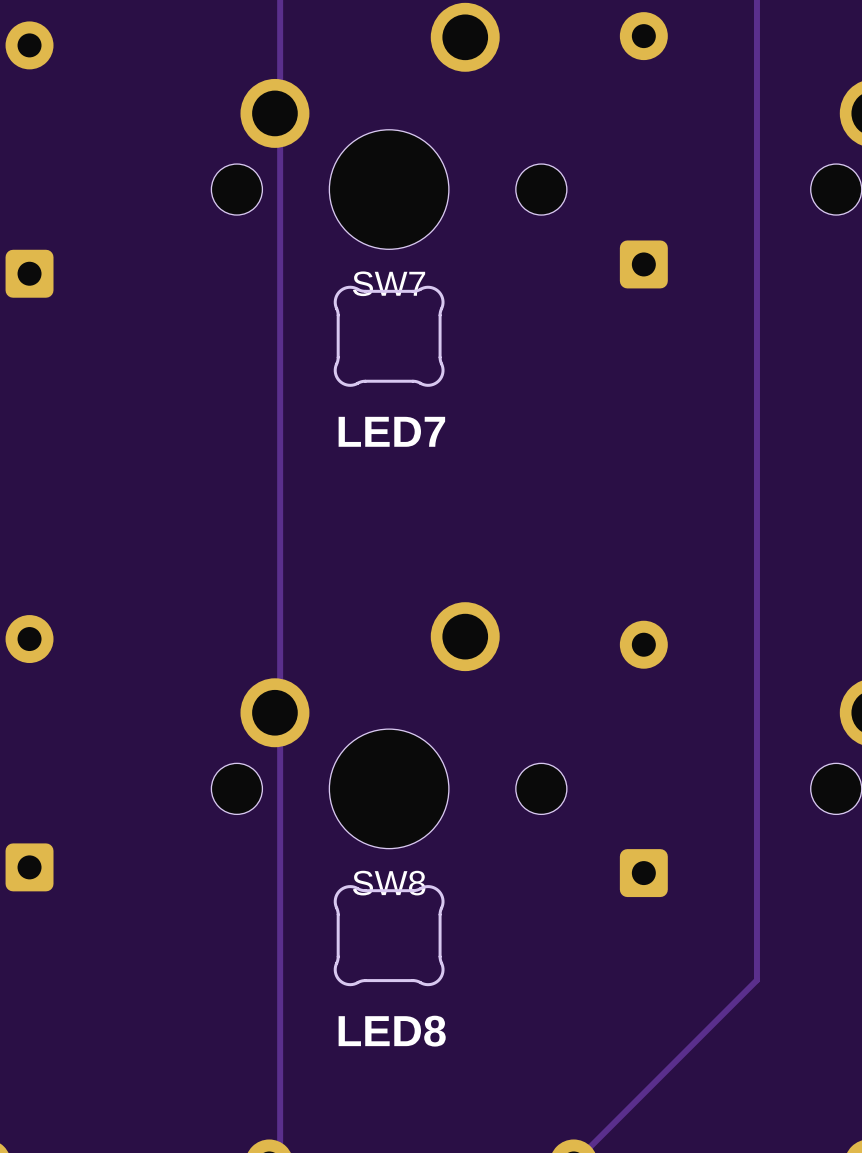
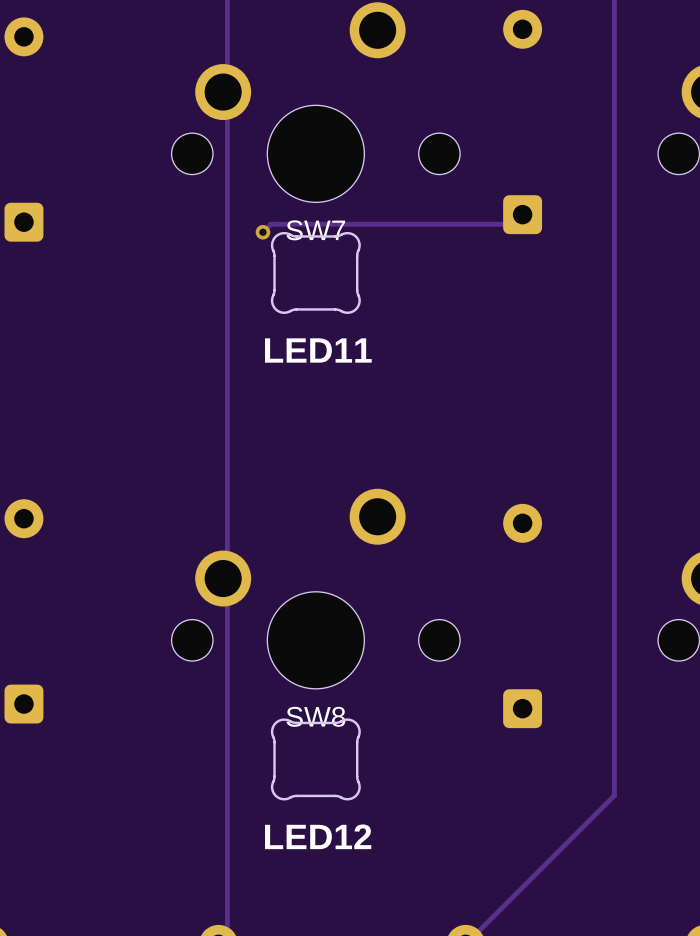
track: none -> (522, 214) (513, 224) (270, 224) (262, 232)
via: none -> (262, 232)
LED7 name: LED7 (391, 431) -> LED11 (318, 350)
LED8 name: LED8 (392, 1031) -> LED12 (318, 836)

